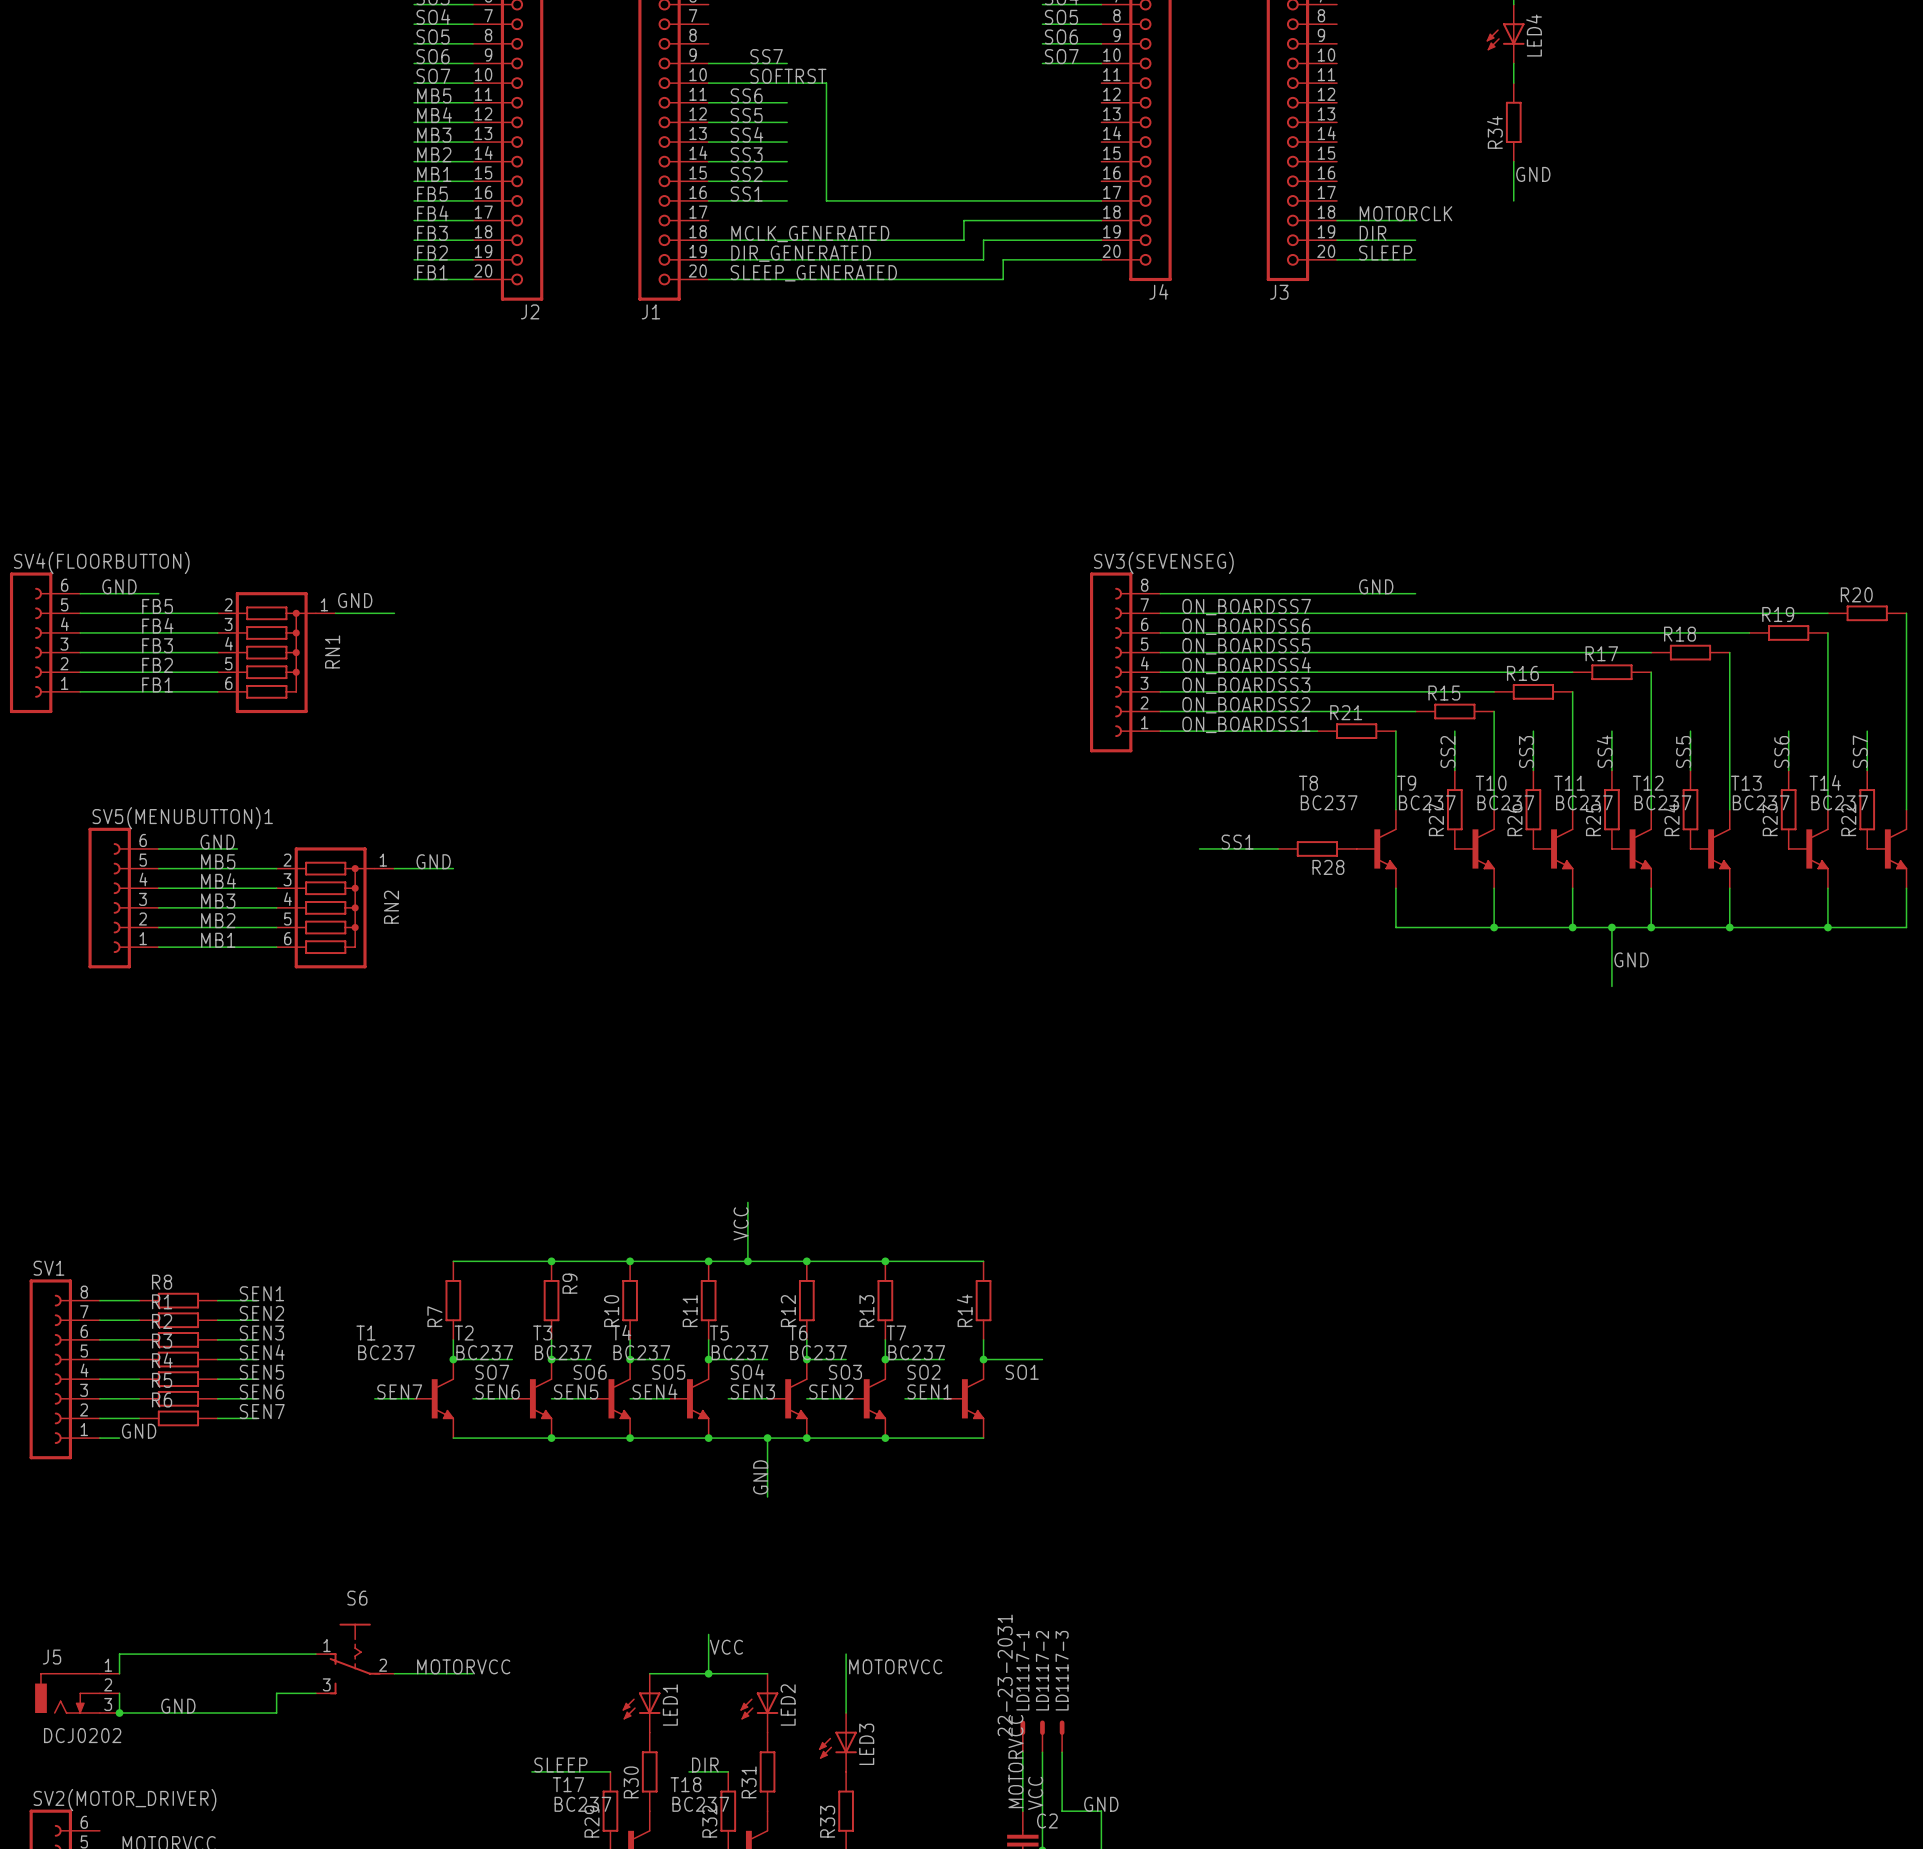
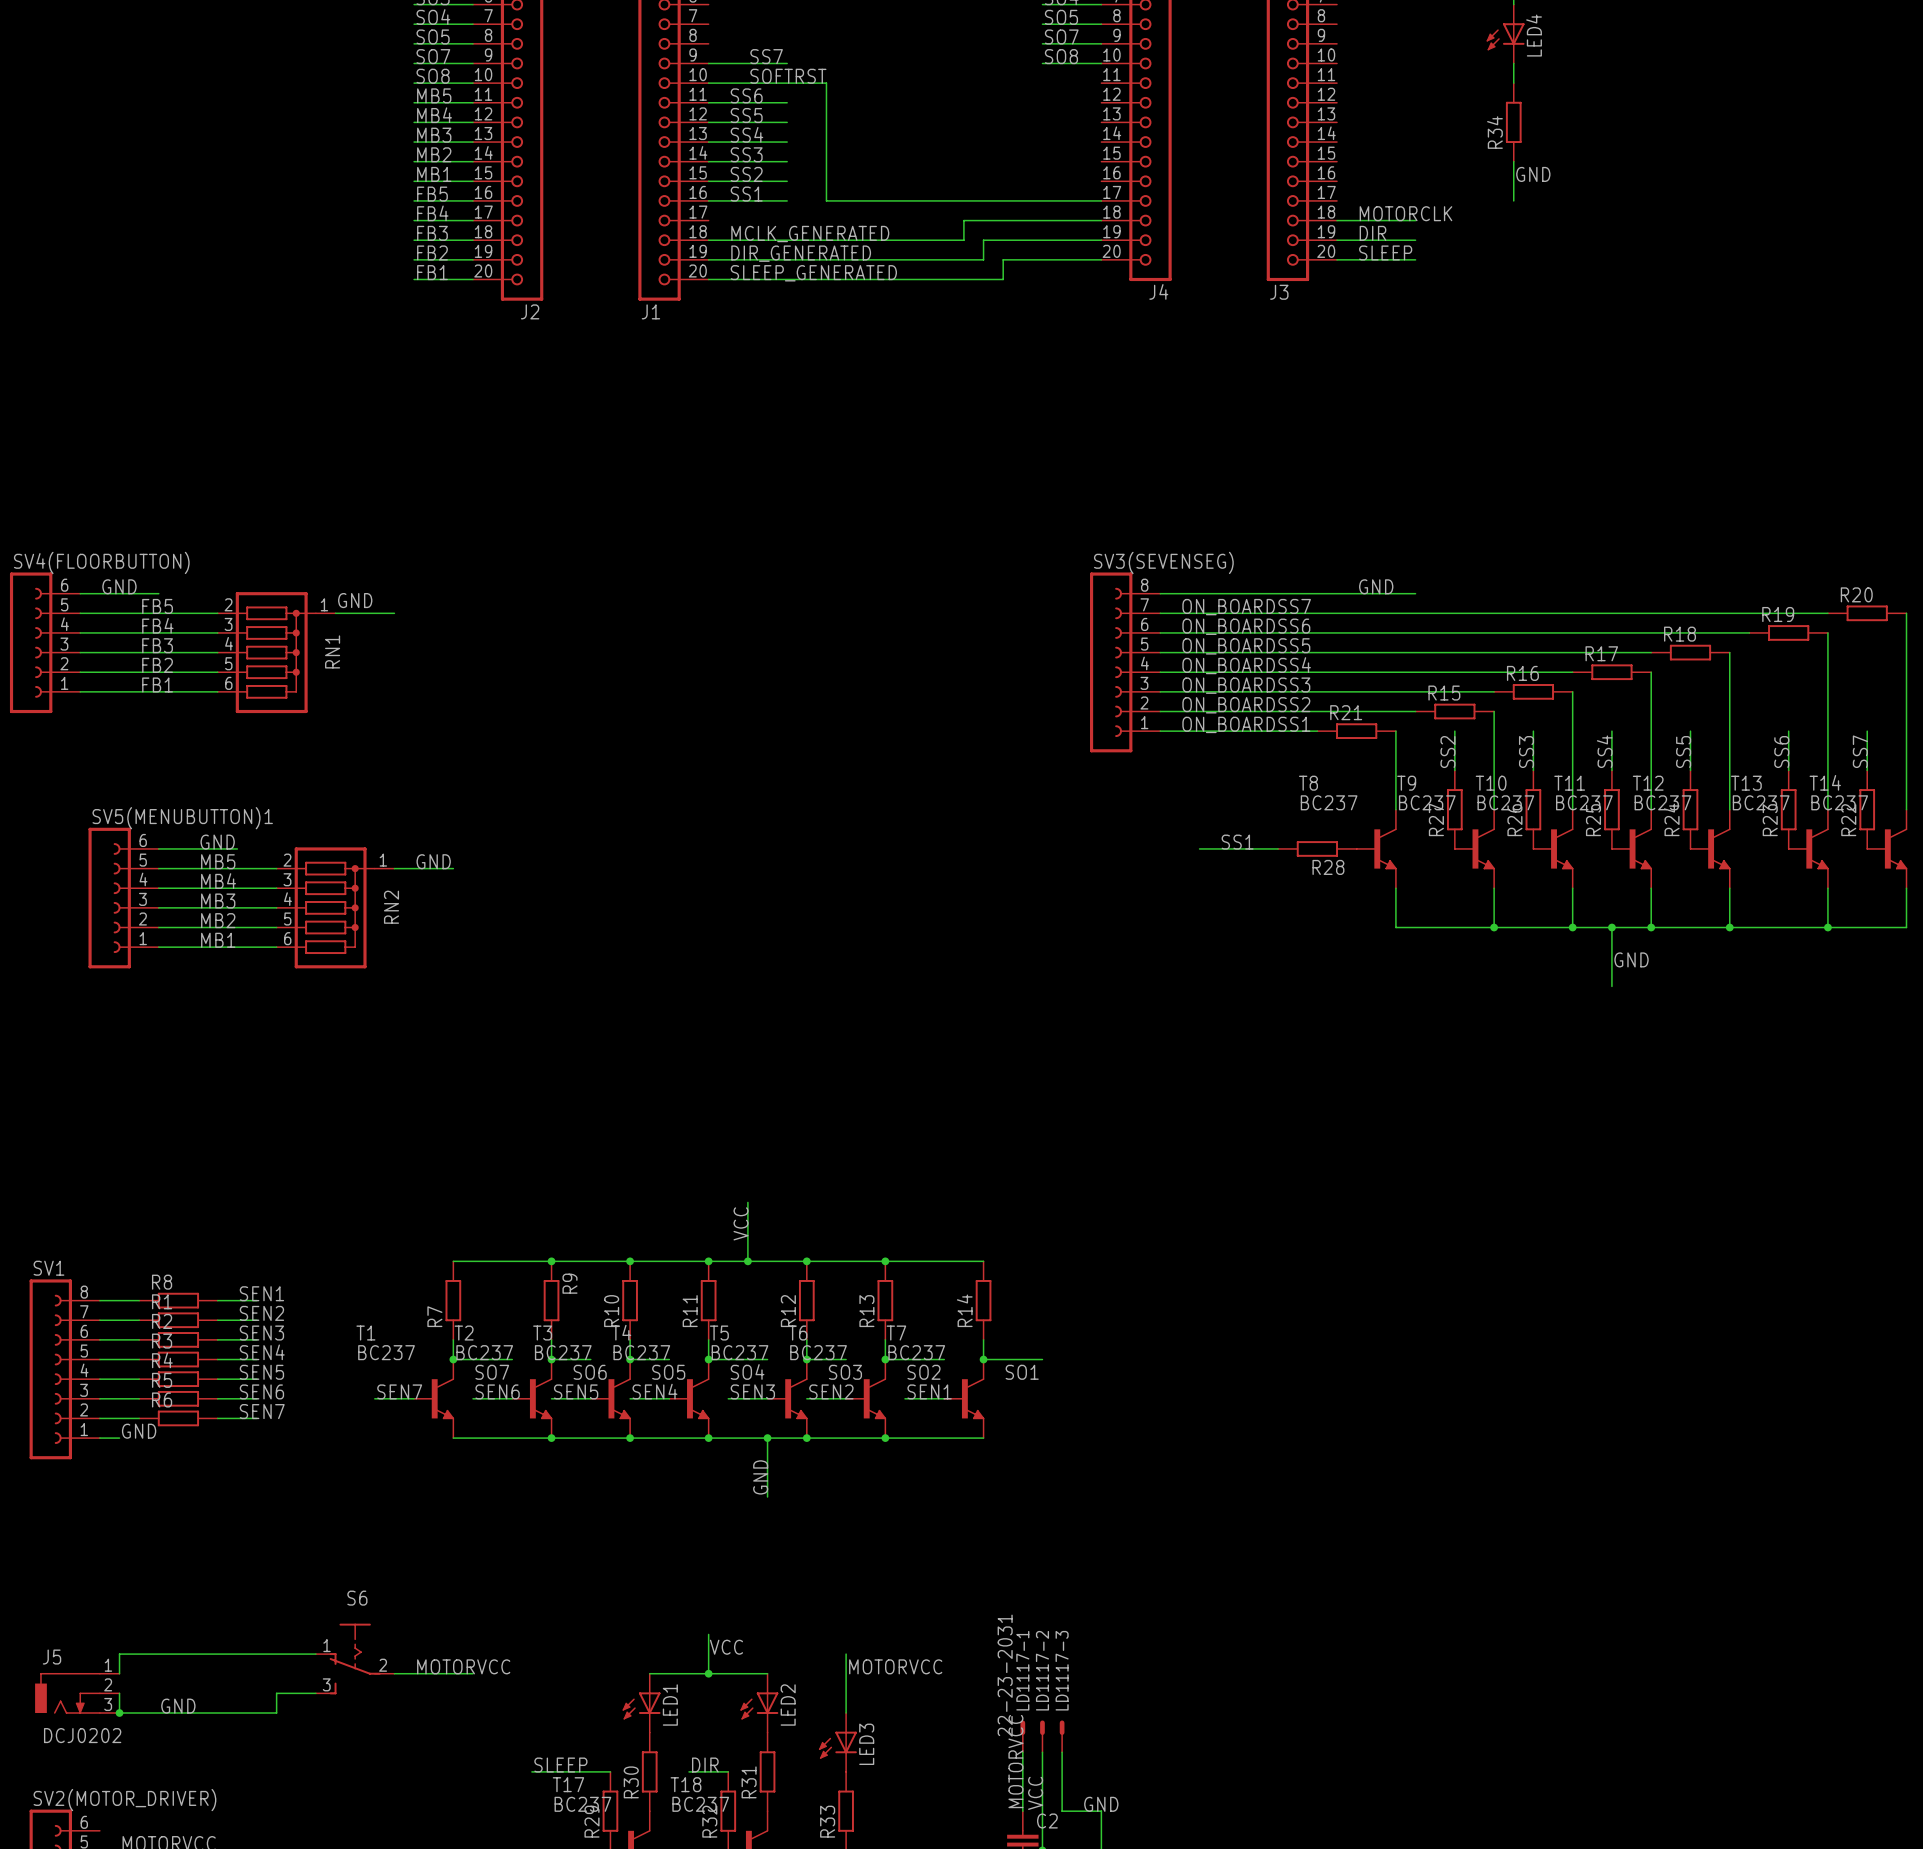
label: SO6 (1061, 36) -> SO7 (1061, 36)
label: SO6 (433, 56) -> SO7 (433, 56)
label: SO7 (1061, 56) -> SO8 (1061, 56)
label: SO7 (433, 76) -> SO8 (433, 76)

